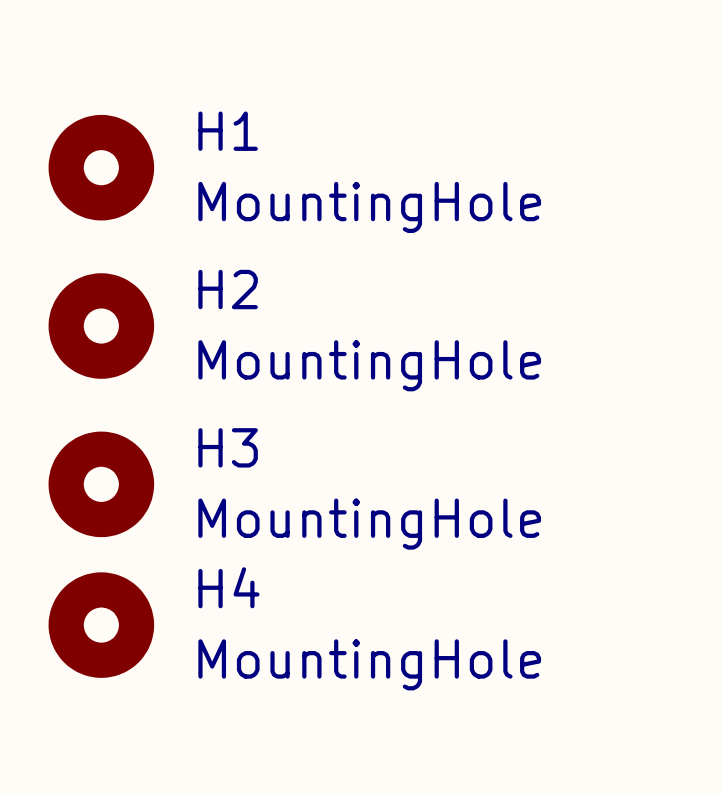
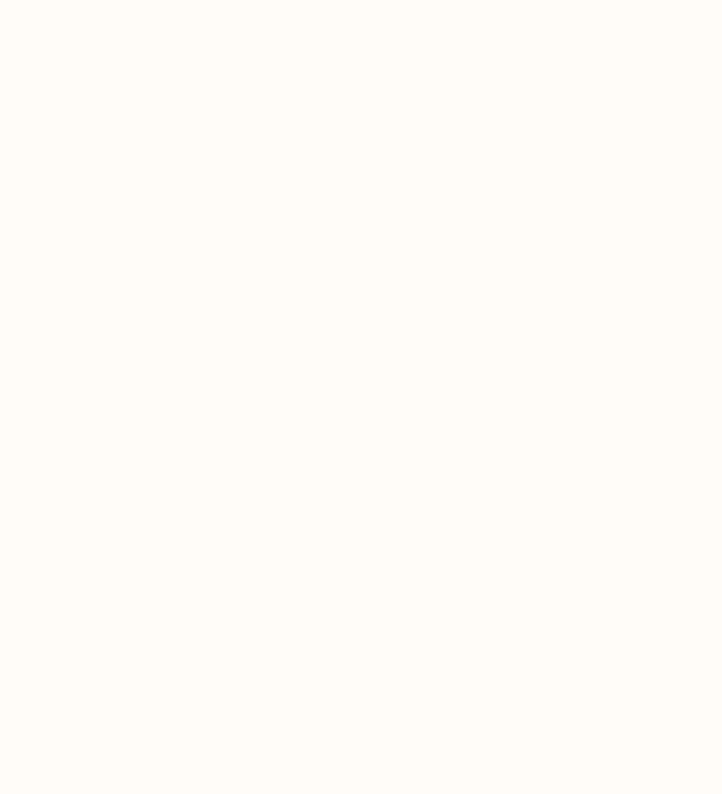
H1: MountingHole (101, 167) -> none
H2: MountingHole (101, 326) -> none
H3: MountingHole (101, 484) -> none
H4: MountingHole (101, 625) -> none

